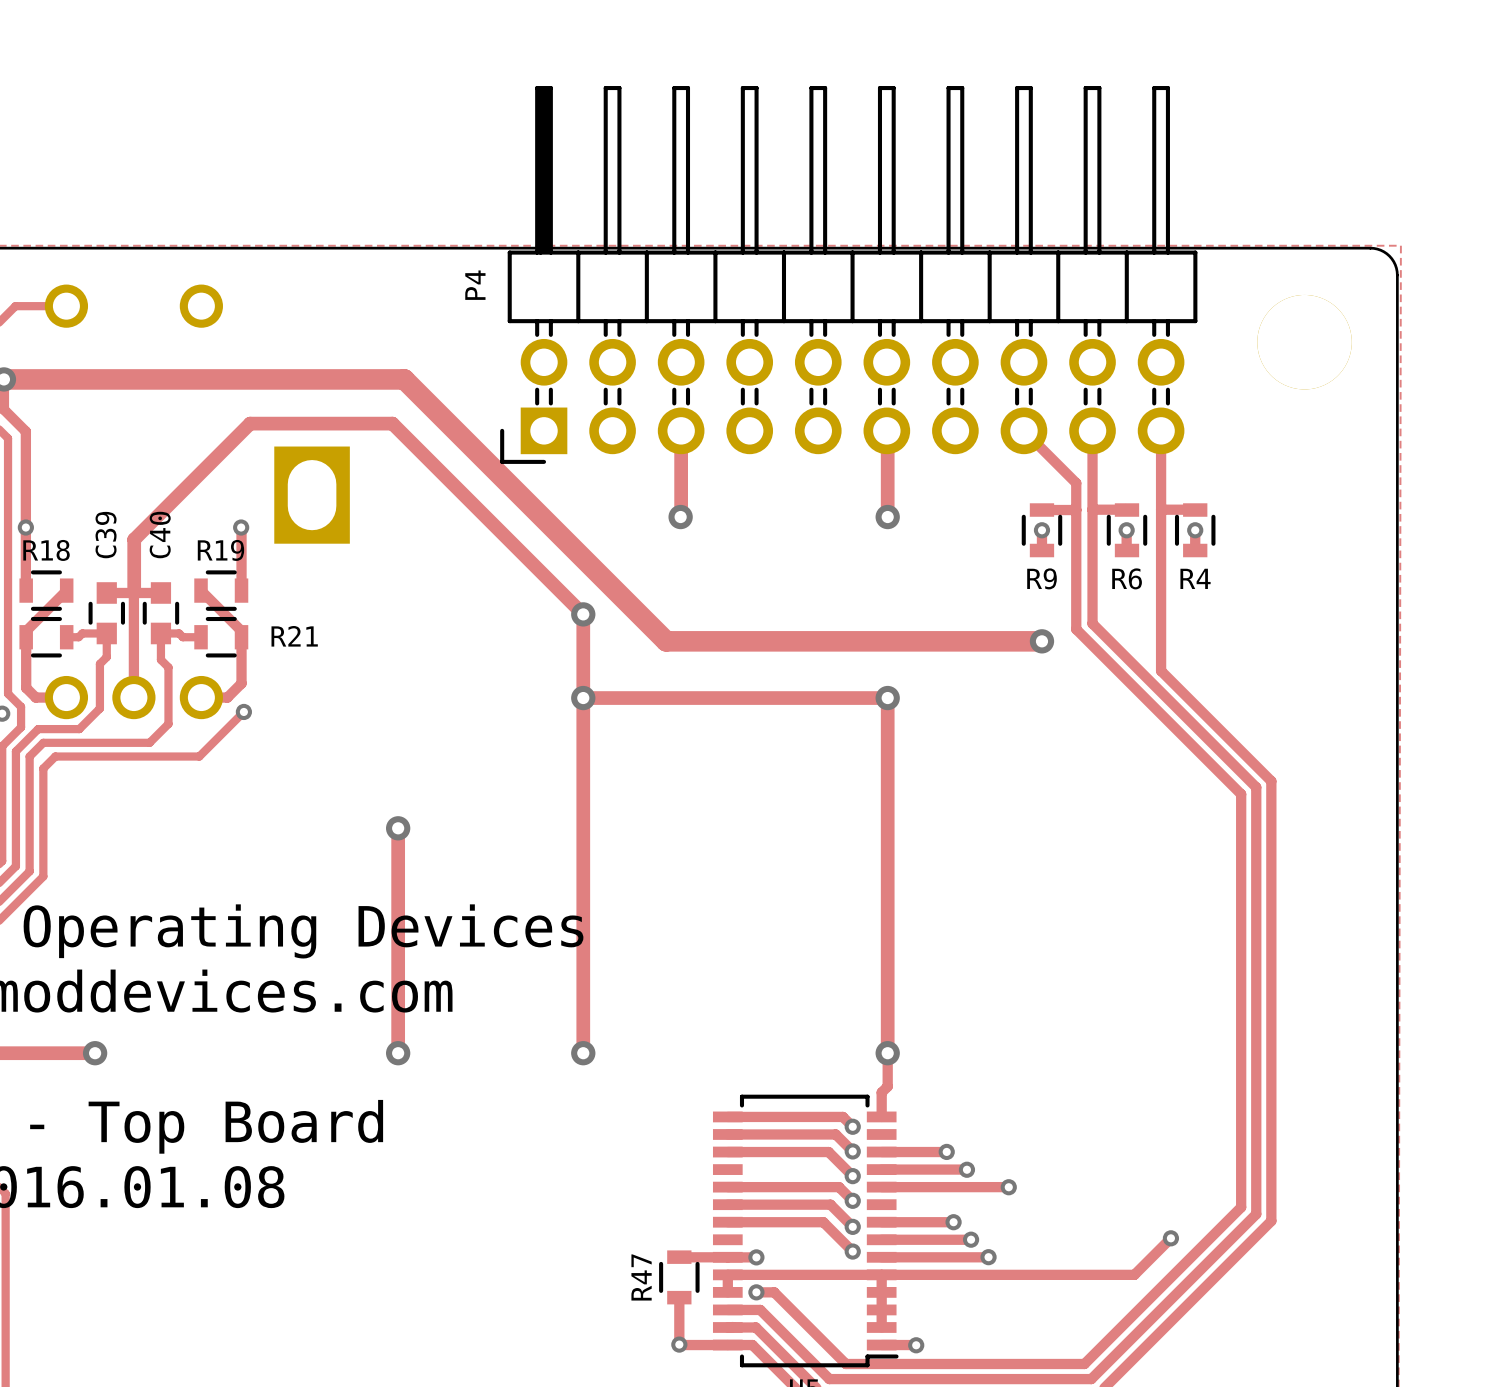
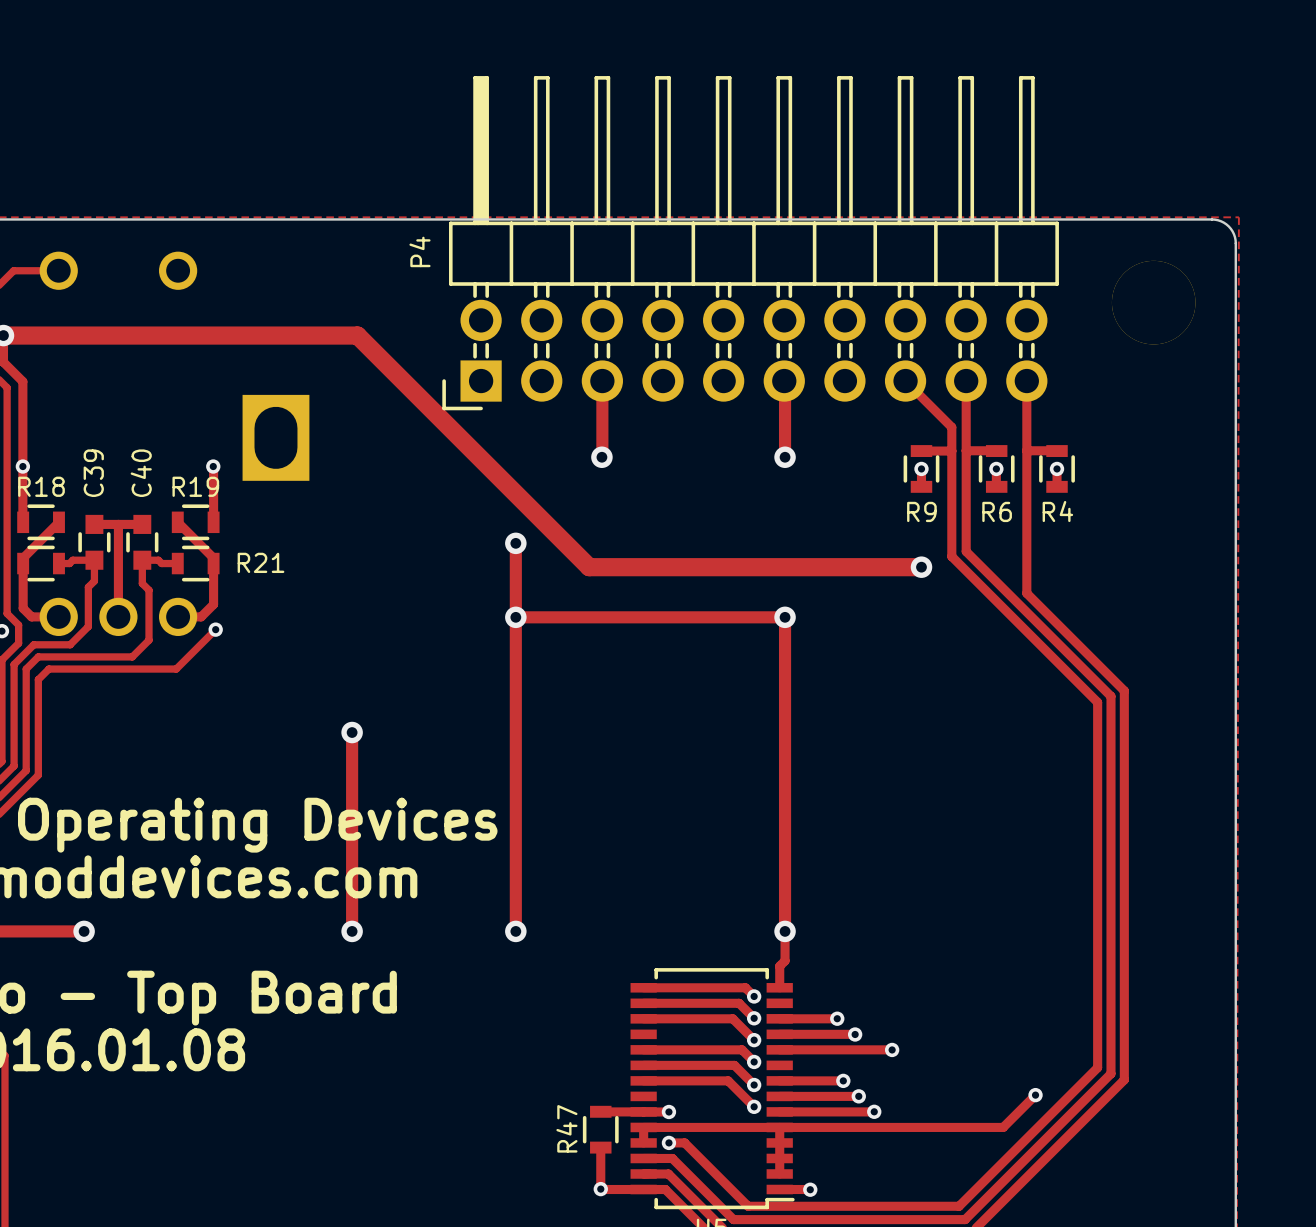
track: (134, 593) (134, 539) (250, 423) (392, 423) (583, 614) -> none

